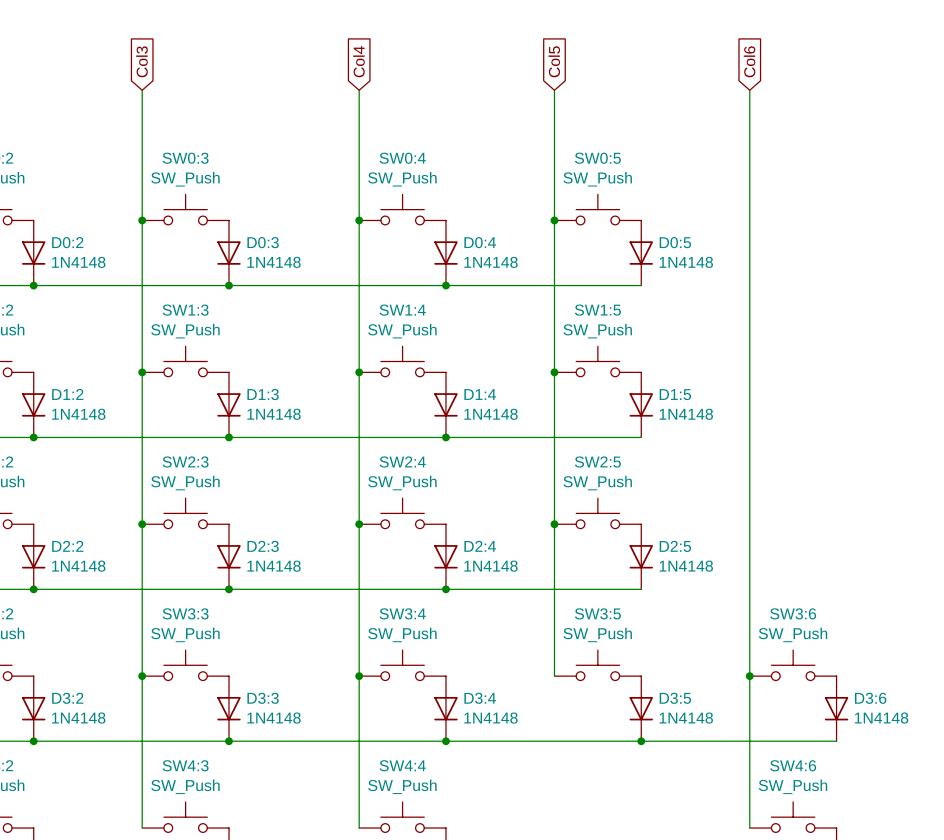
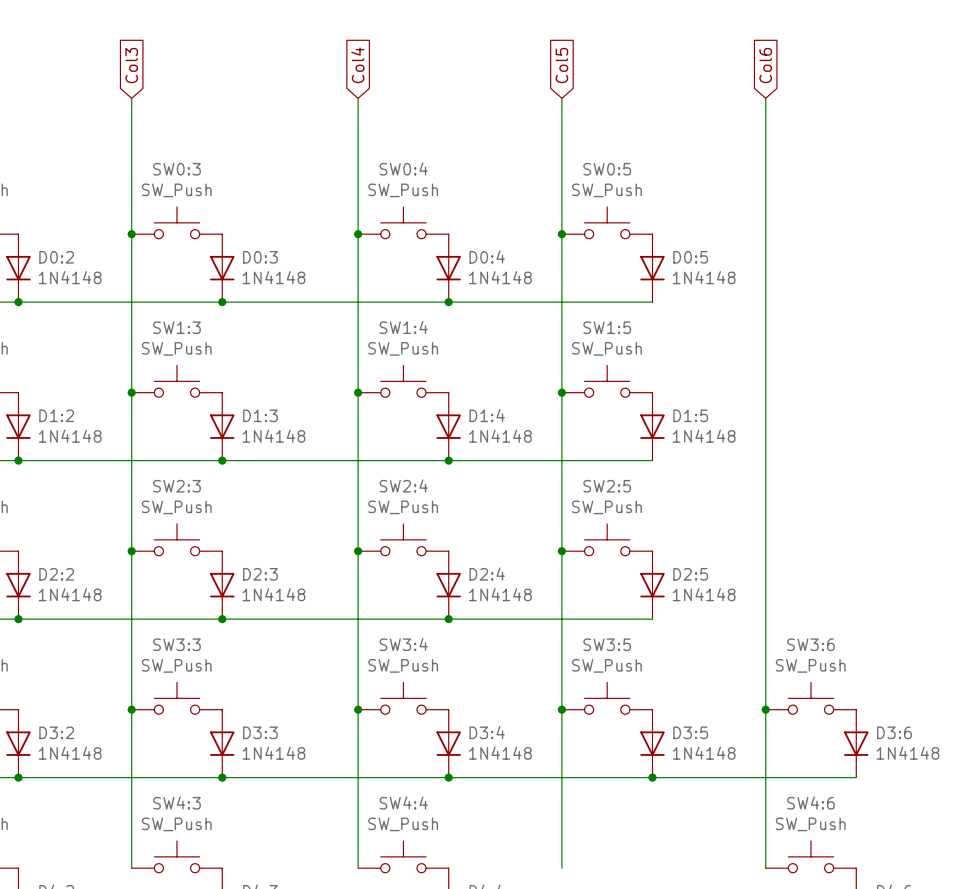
wire: none -> (561, 709) (561, 868)
junction: none -> (561, 709)

